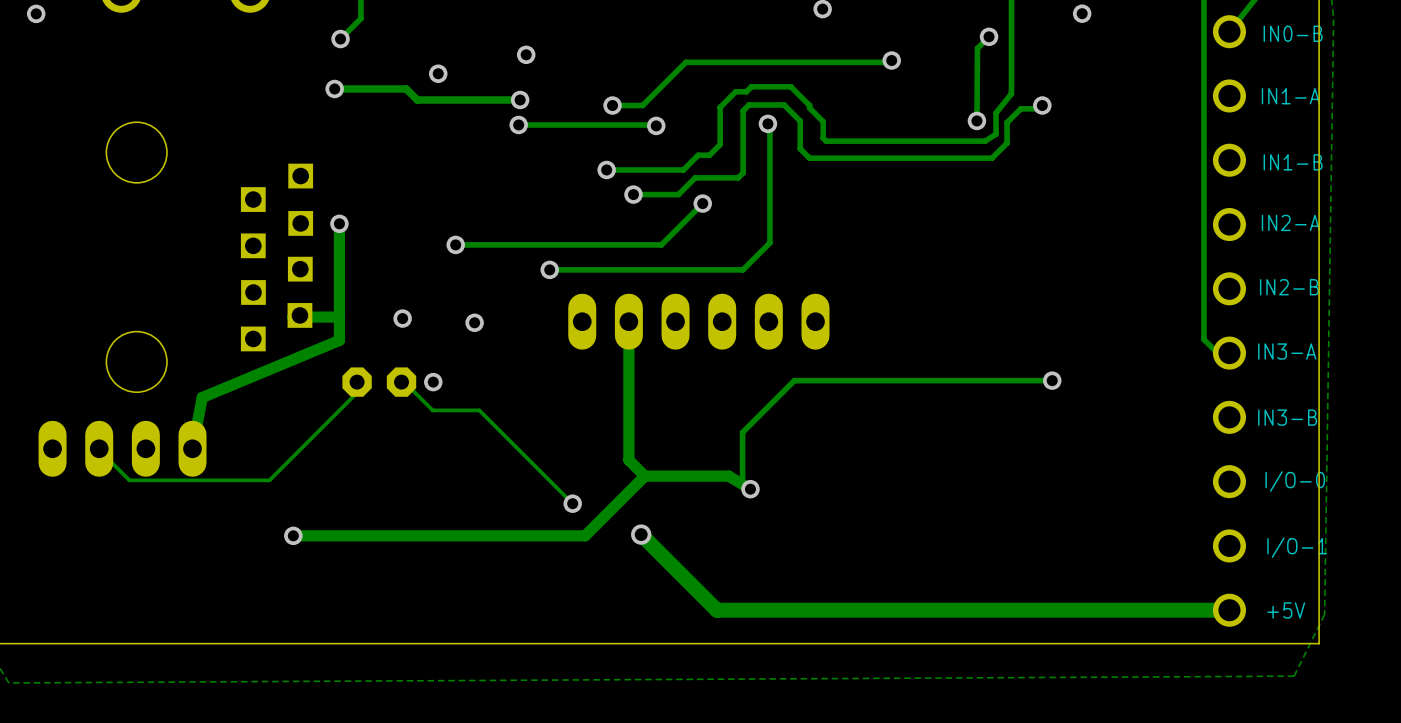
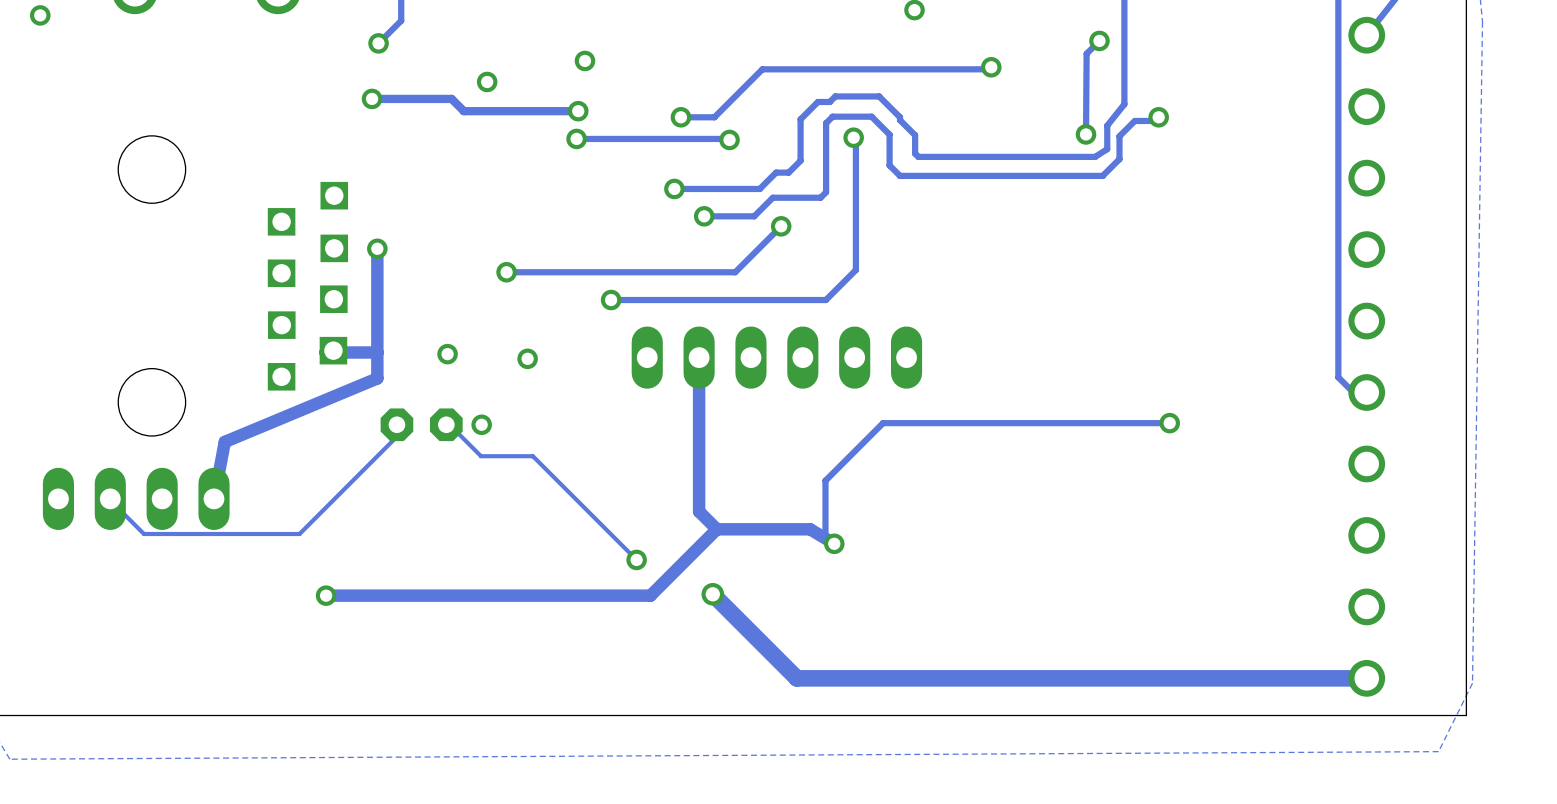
via: (1082, 13) -> none
text: IN0-B (1293, 33) -> none
text: IN1-A (1290, 96) -> none
text: IN1-B (1293, 162) -> none
text: IN2-A (1290, 222) -> none
text: IN2-B (1289, 287) -> none
text: IN3-A (1287, 351) -> none
text: IN3-B (1287, 417) -> none
text: I/O-0 (1295, 481) -> none
text: I/O-1 (1297, 547) -> none
text: +5V (1286, 610) -> none

